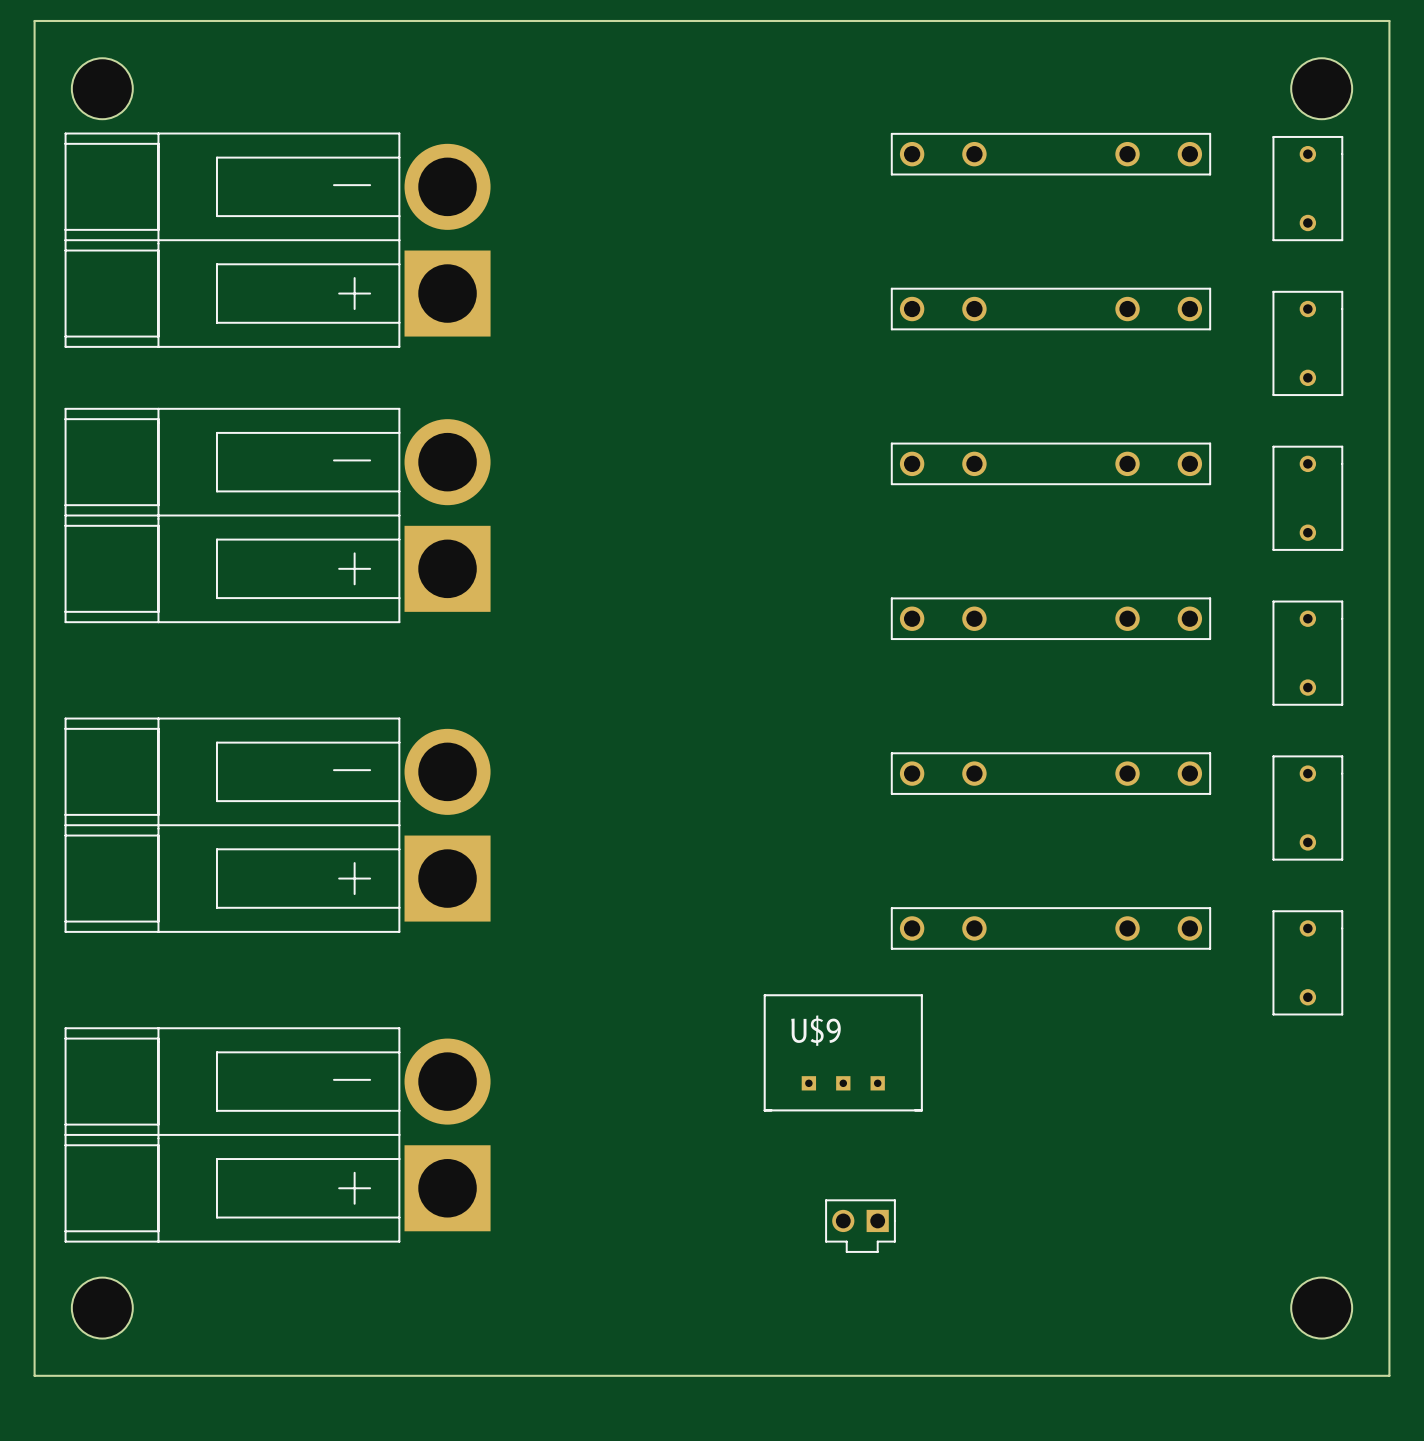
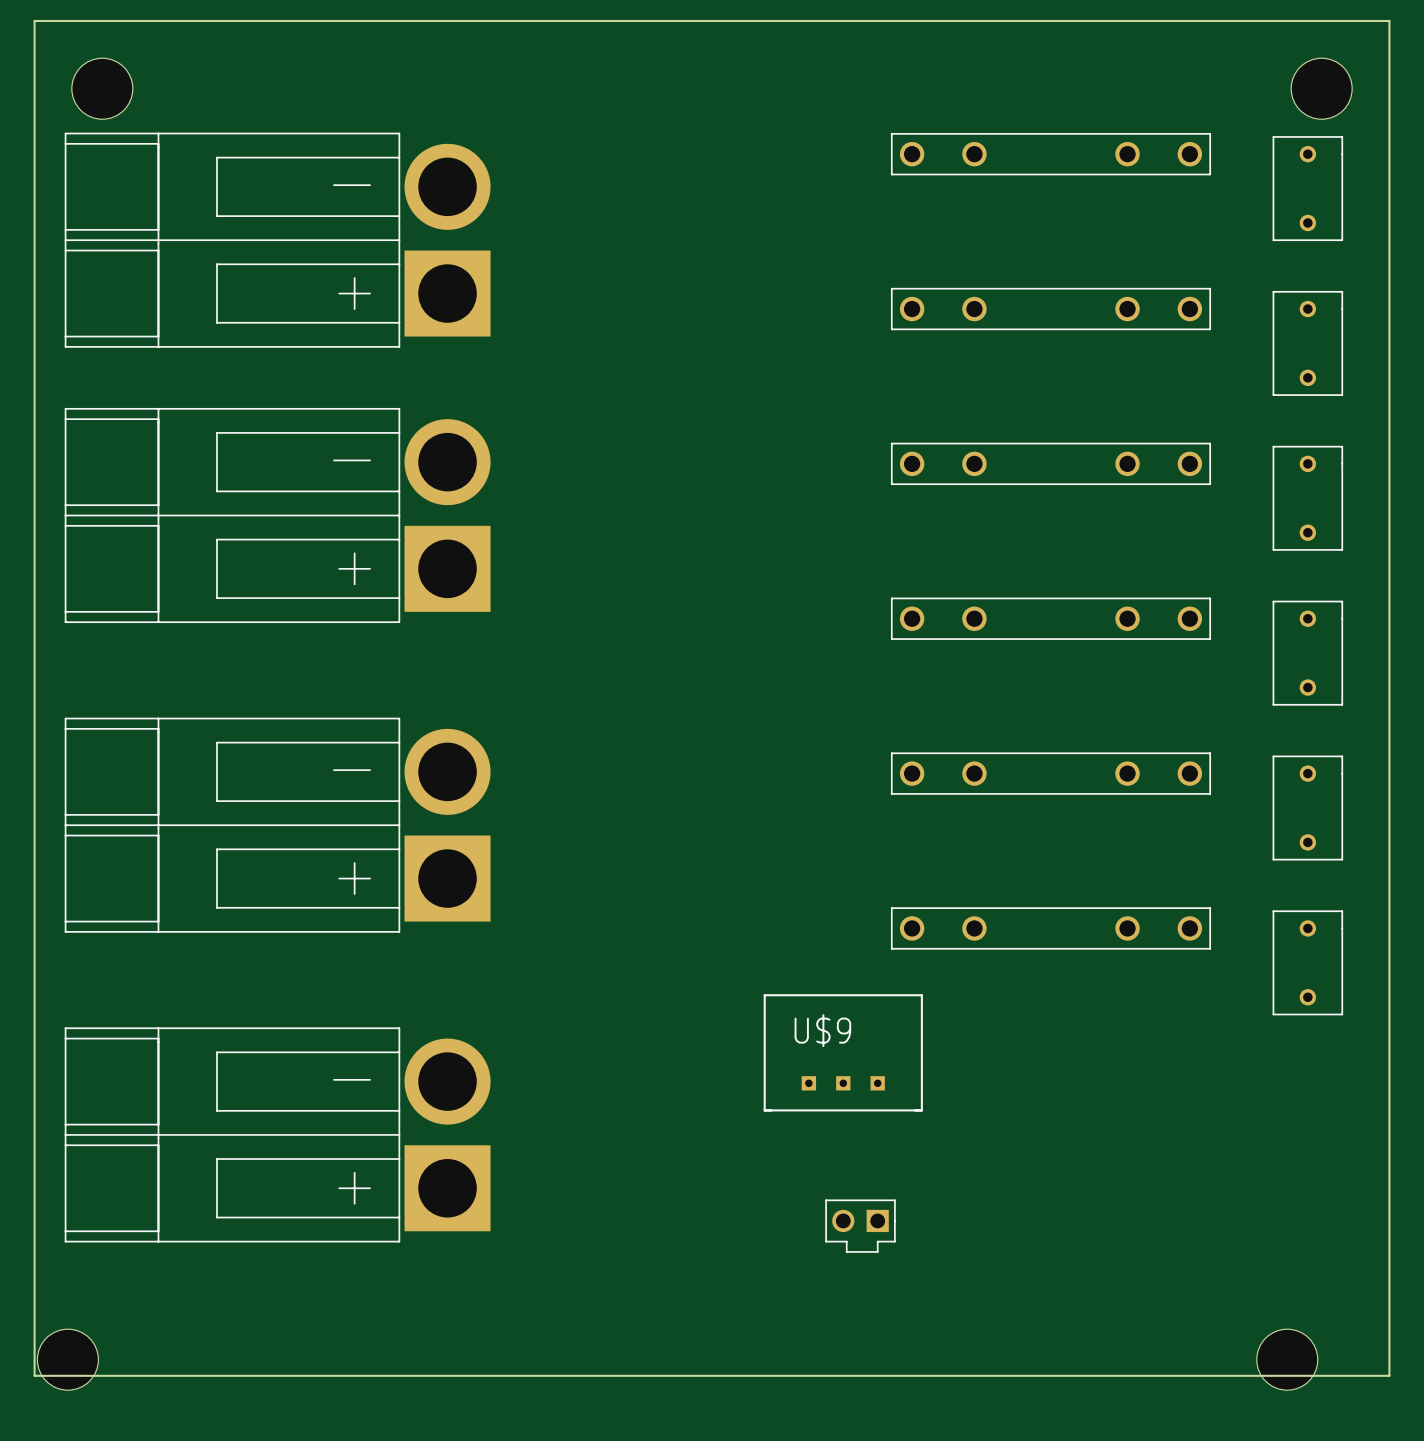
hole position: (102, 1308) -> (67, 1359)
hole position: (1321, 1308) -> (1287, 1359)

